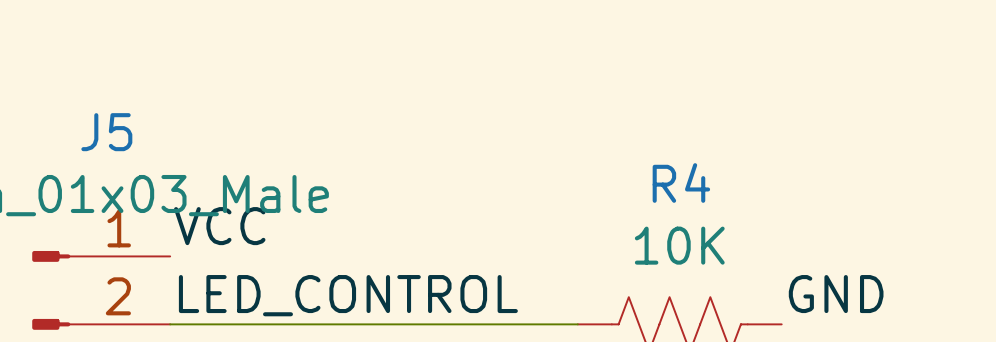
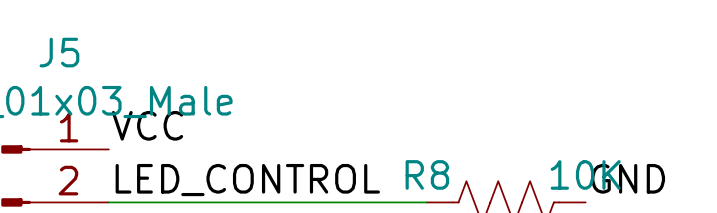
R4 name: R4 (681, 182) -> R8 (427, 174)
R4 value position: 10K (679, 245) -> 10K (585, 174)

